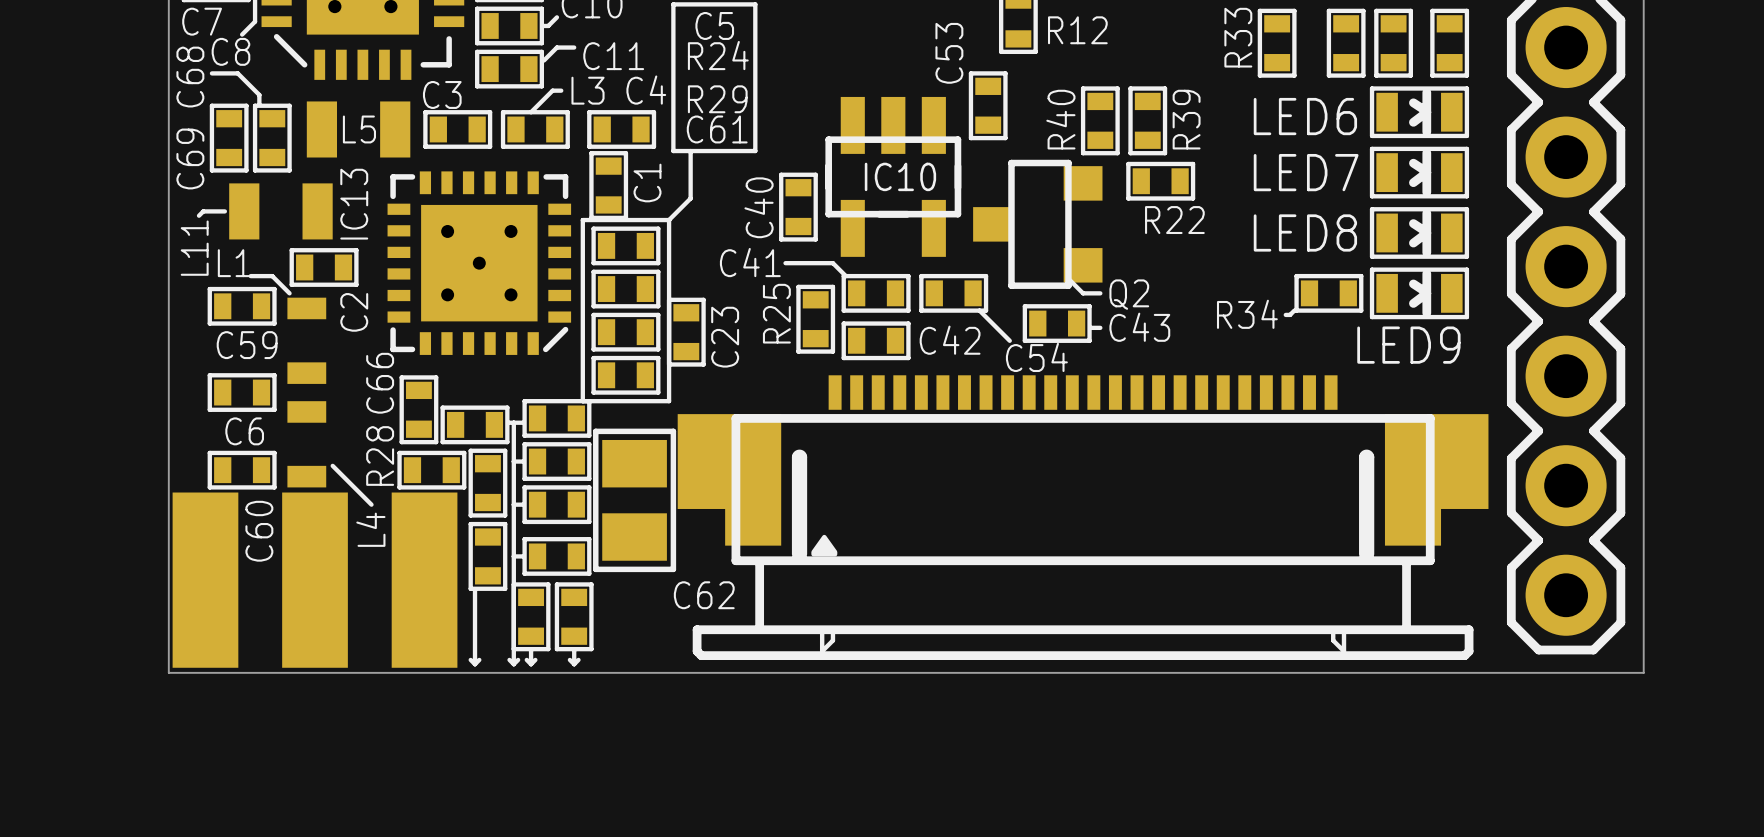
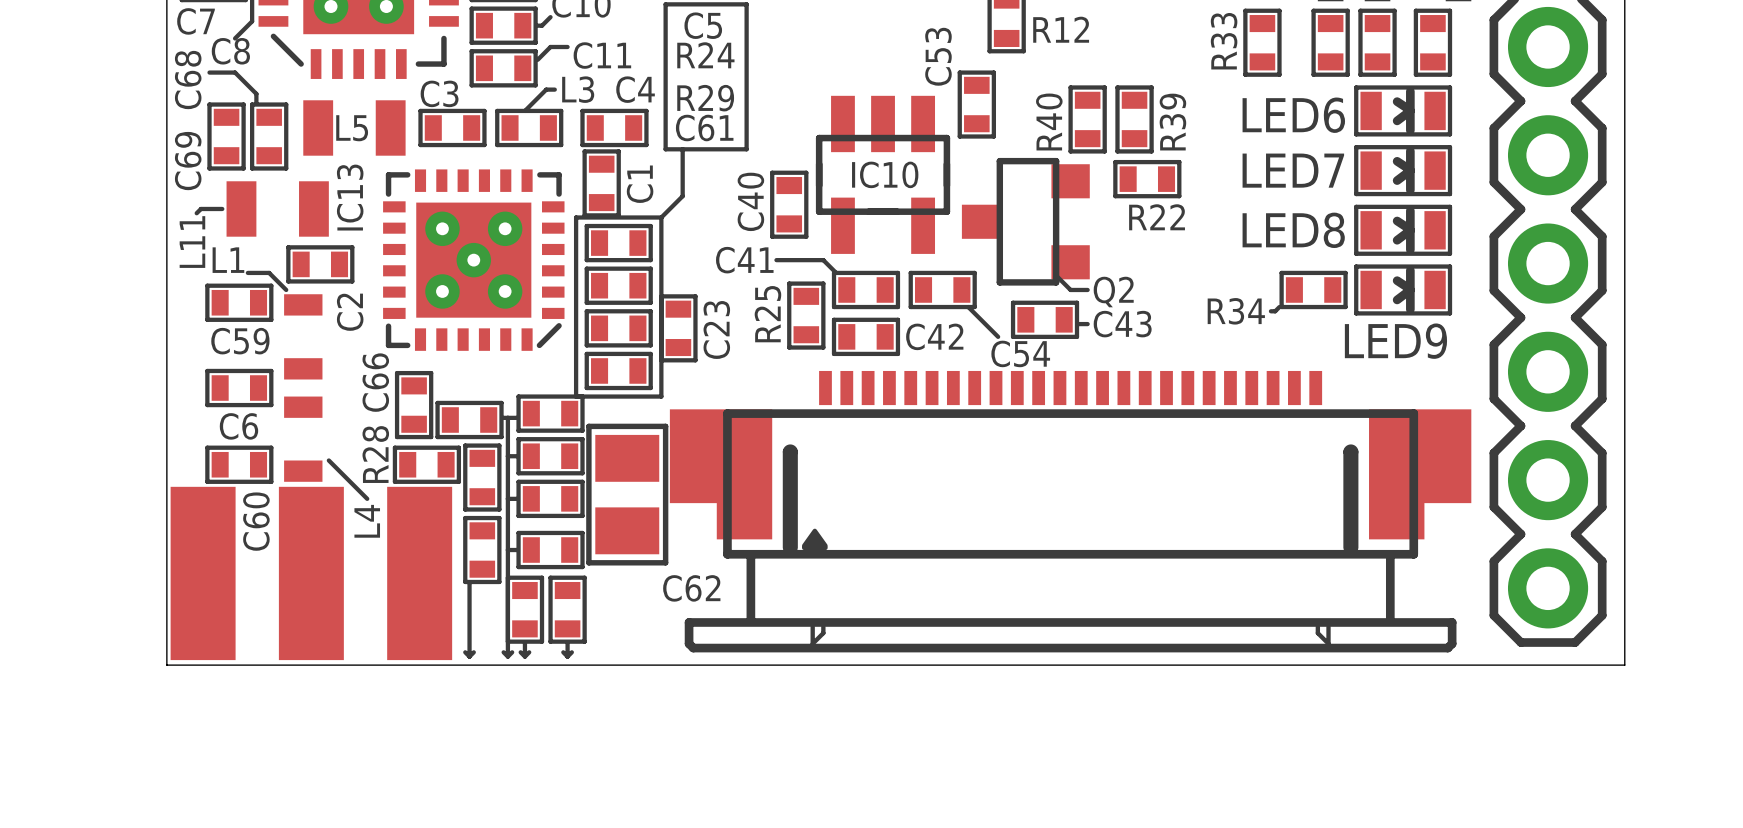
line: none -> (239, 34) (235, 38)

